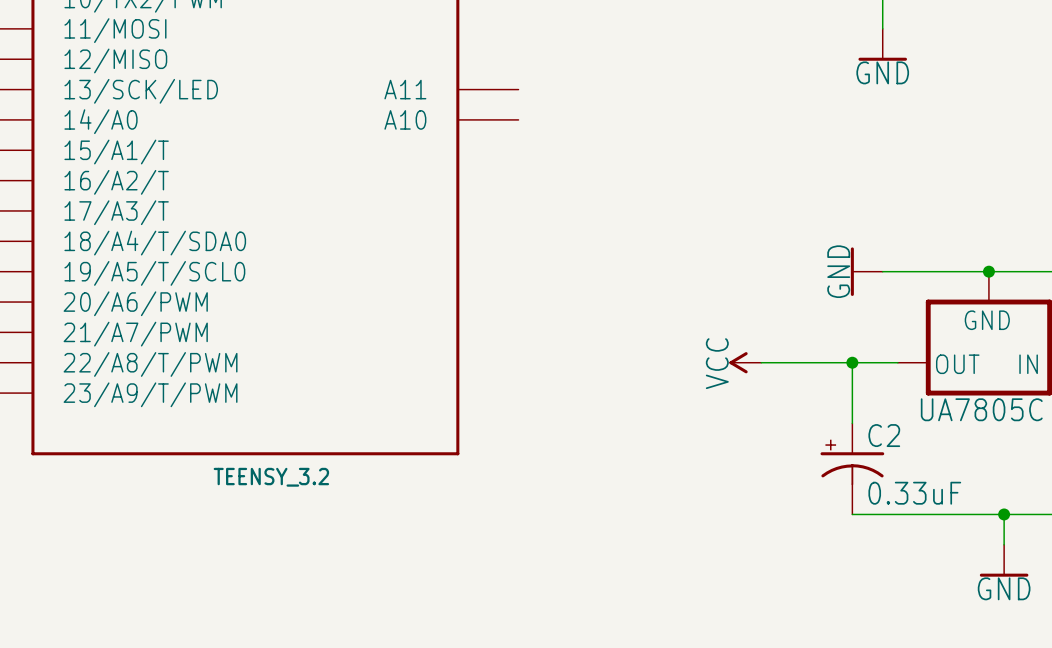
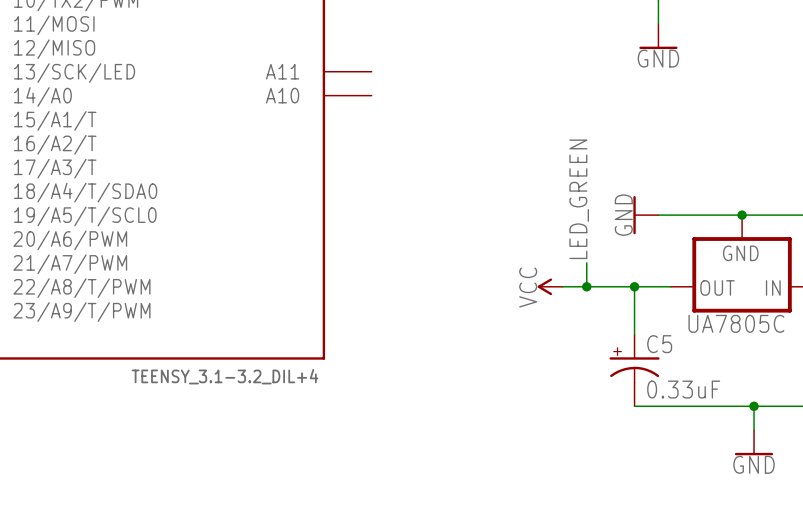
label: none -> LED_GREEN (579, 199)
wire: none -> (586, 262) (586, 286)
junction: none -> (586, 286)
C2 name: C2 (884, 435) -> C5 (659, 344)
part value: TEENSY_3.2 (271, 477) -> TEENSY_3.1-3.2_DIL+4 (224, 376)

